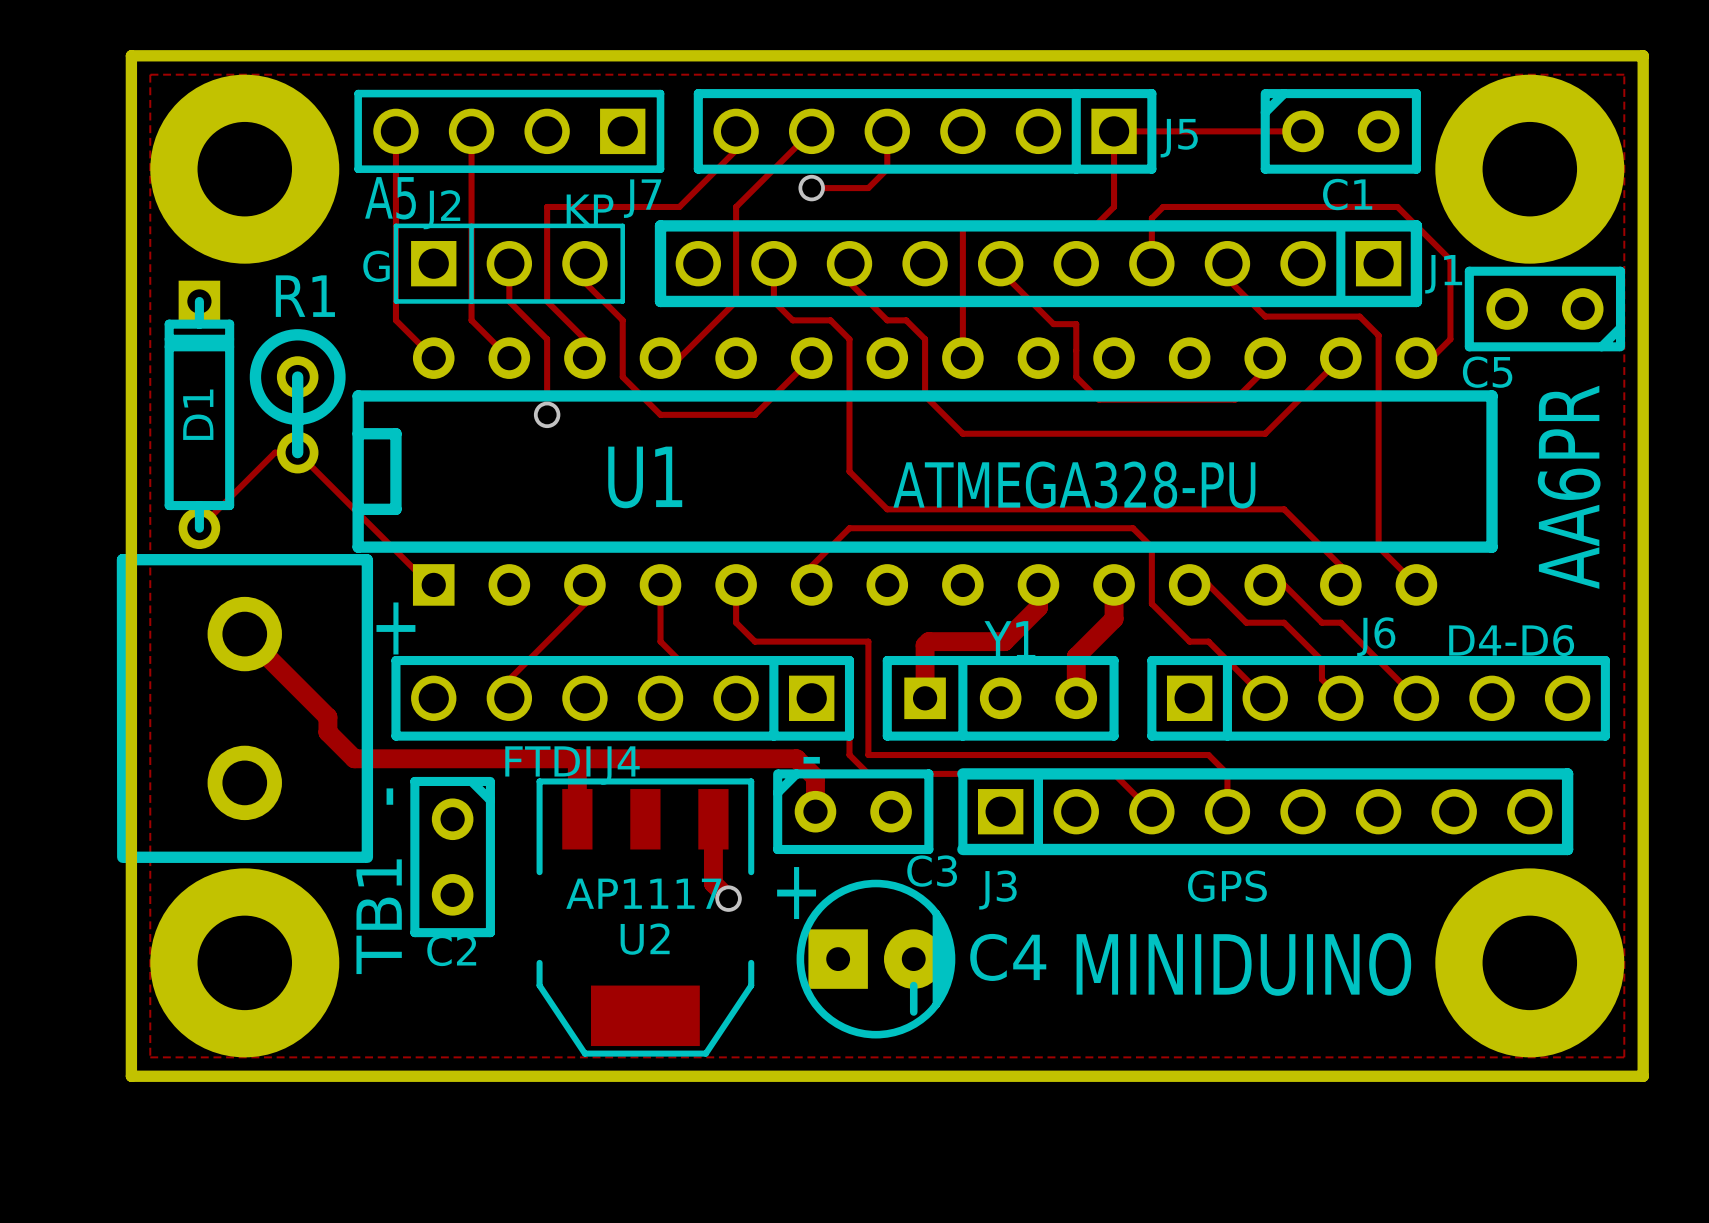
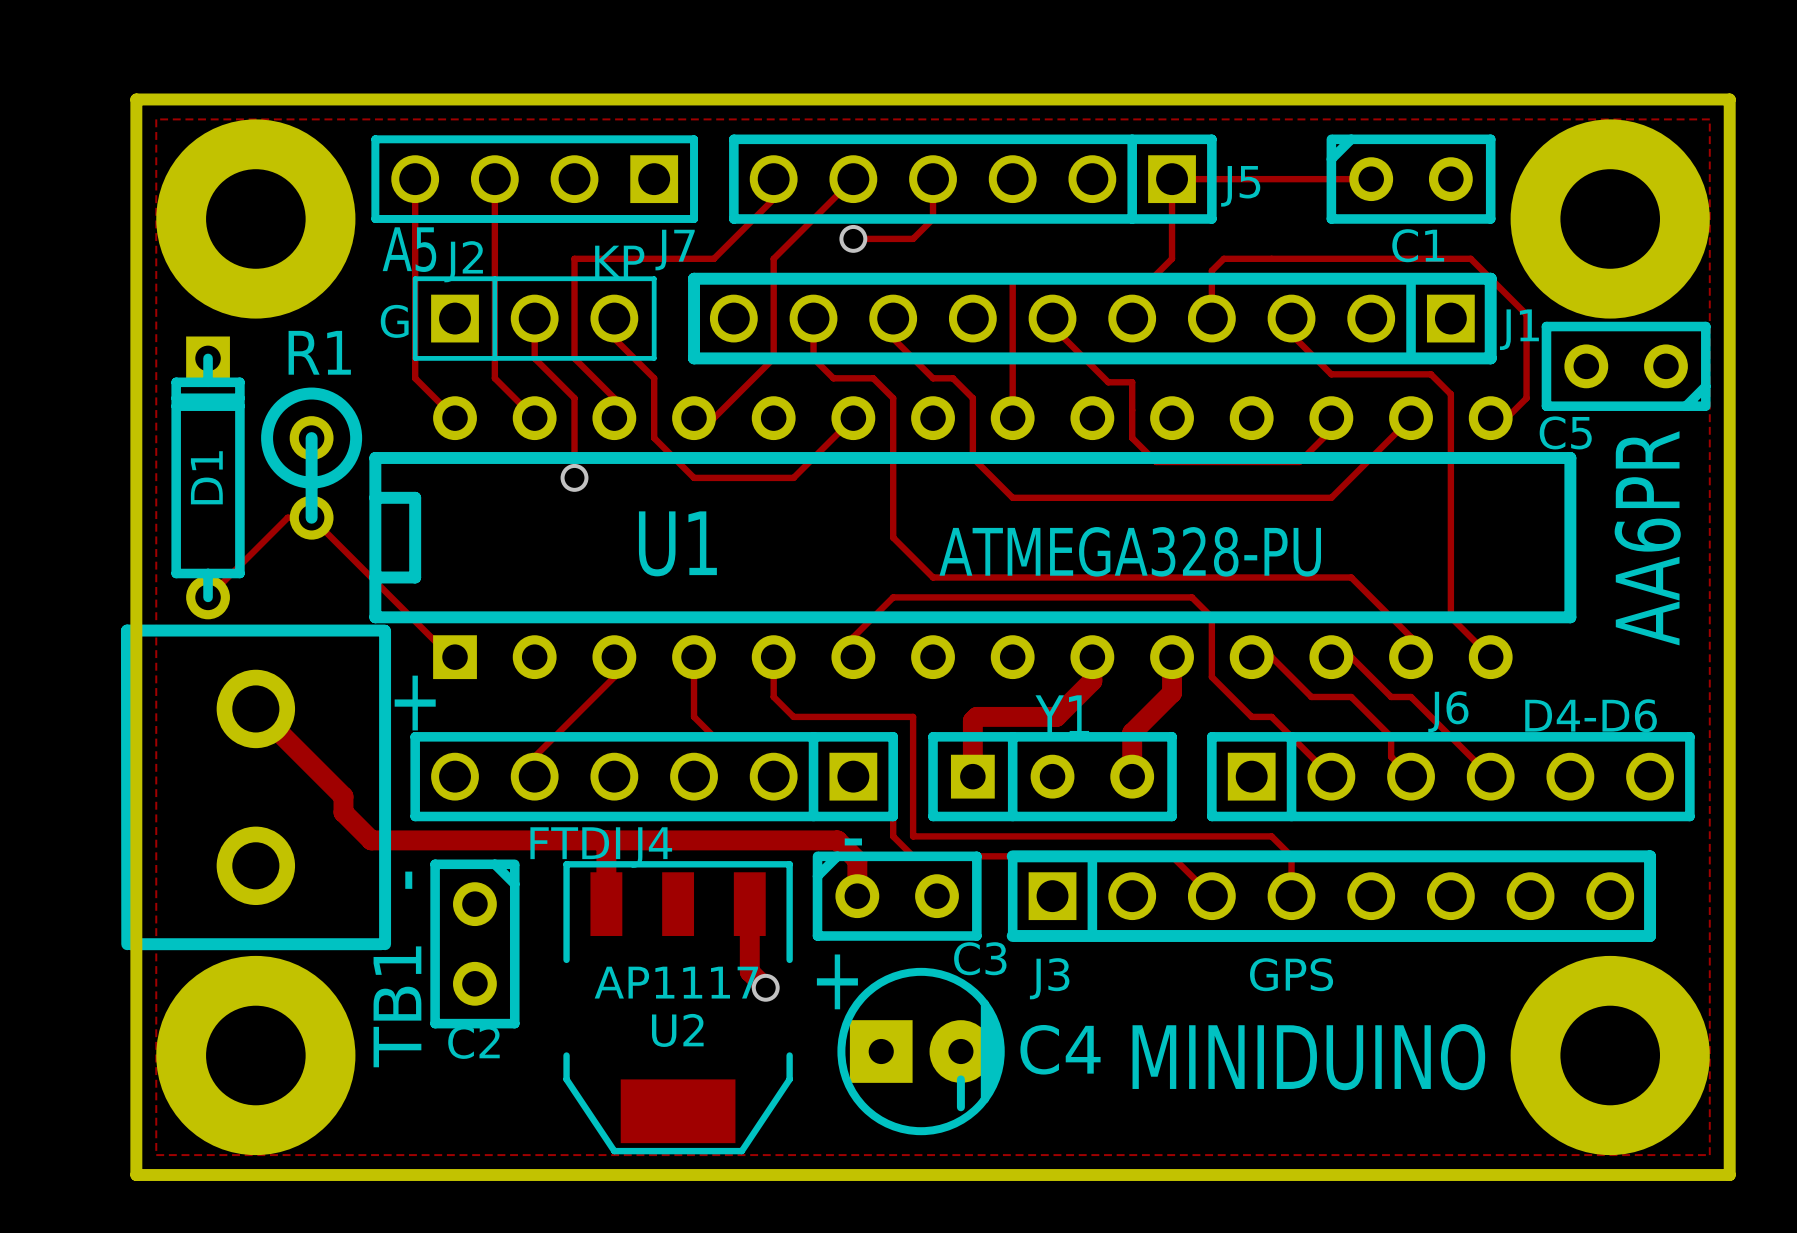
text position: AA6PR (1569, 487) -> AA6PR (1647, 538)

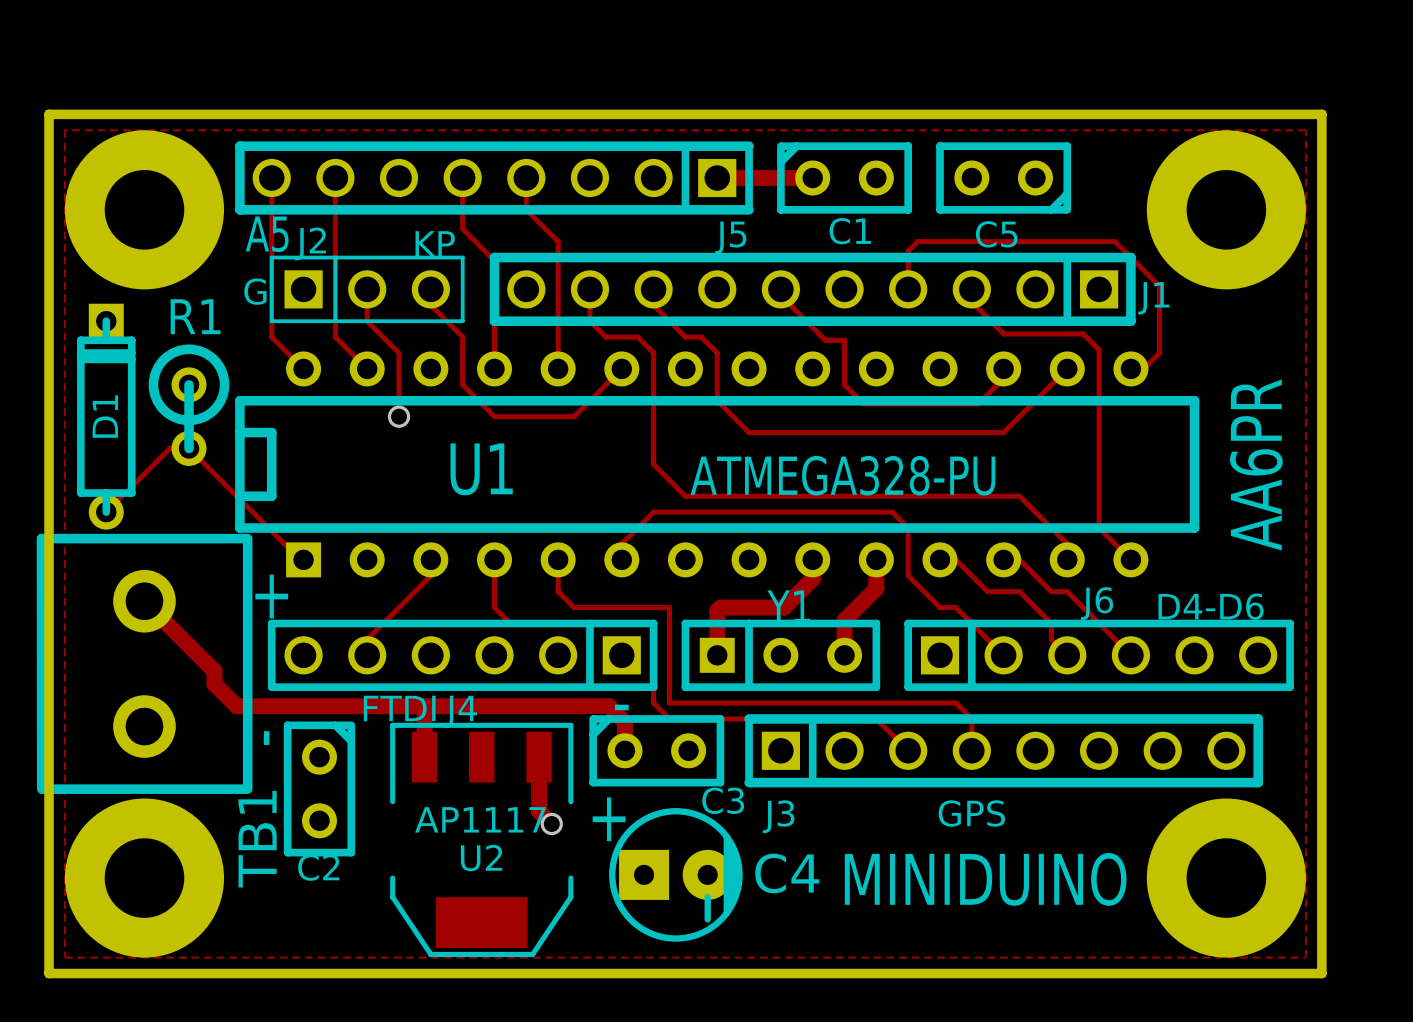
J5 footprint: [729, 134, 1217, 224] -> [235, 141, 754, 215]
J7: (534, 179) -> none
track: none -> (462, 178) (462, 228) (494, 260) (494, 368)
track: (773, 179) (773, 199) (713, 258) (574, 258) (574, 358) (614, 398) (614, 418) -> none
track: (853, 179) (773, 258) -> (526, 178) (526, 209) (558, 241)
track: (933, 179) (933, 218) (913, 238) (853, 238) -> none
track: none -> (717, 178) (812, 178)
track: (1371, 179) (1172, 179) (1172, 258) (1152, 278) (1012, 278) (1012, 418) -> none
C1 position: (1411, 179) -> (844, 178)
J5 name position: J5 (1240, 186) -> J5 (730, 237)
via: (853, 238) -> none
track: (773, 358) (713, 418) (694, 418) -> (558, 321) (558, 368)
C5 position: (1626, 366) -> (1003, 178)
C5 name position: C5 (1565, 432) -> C5 (996, 234)

